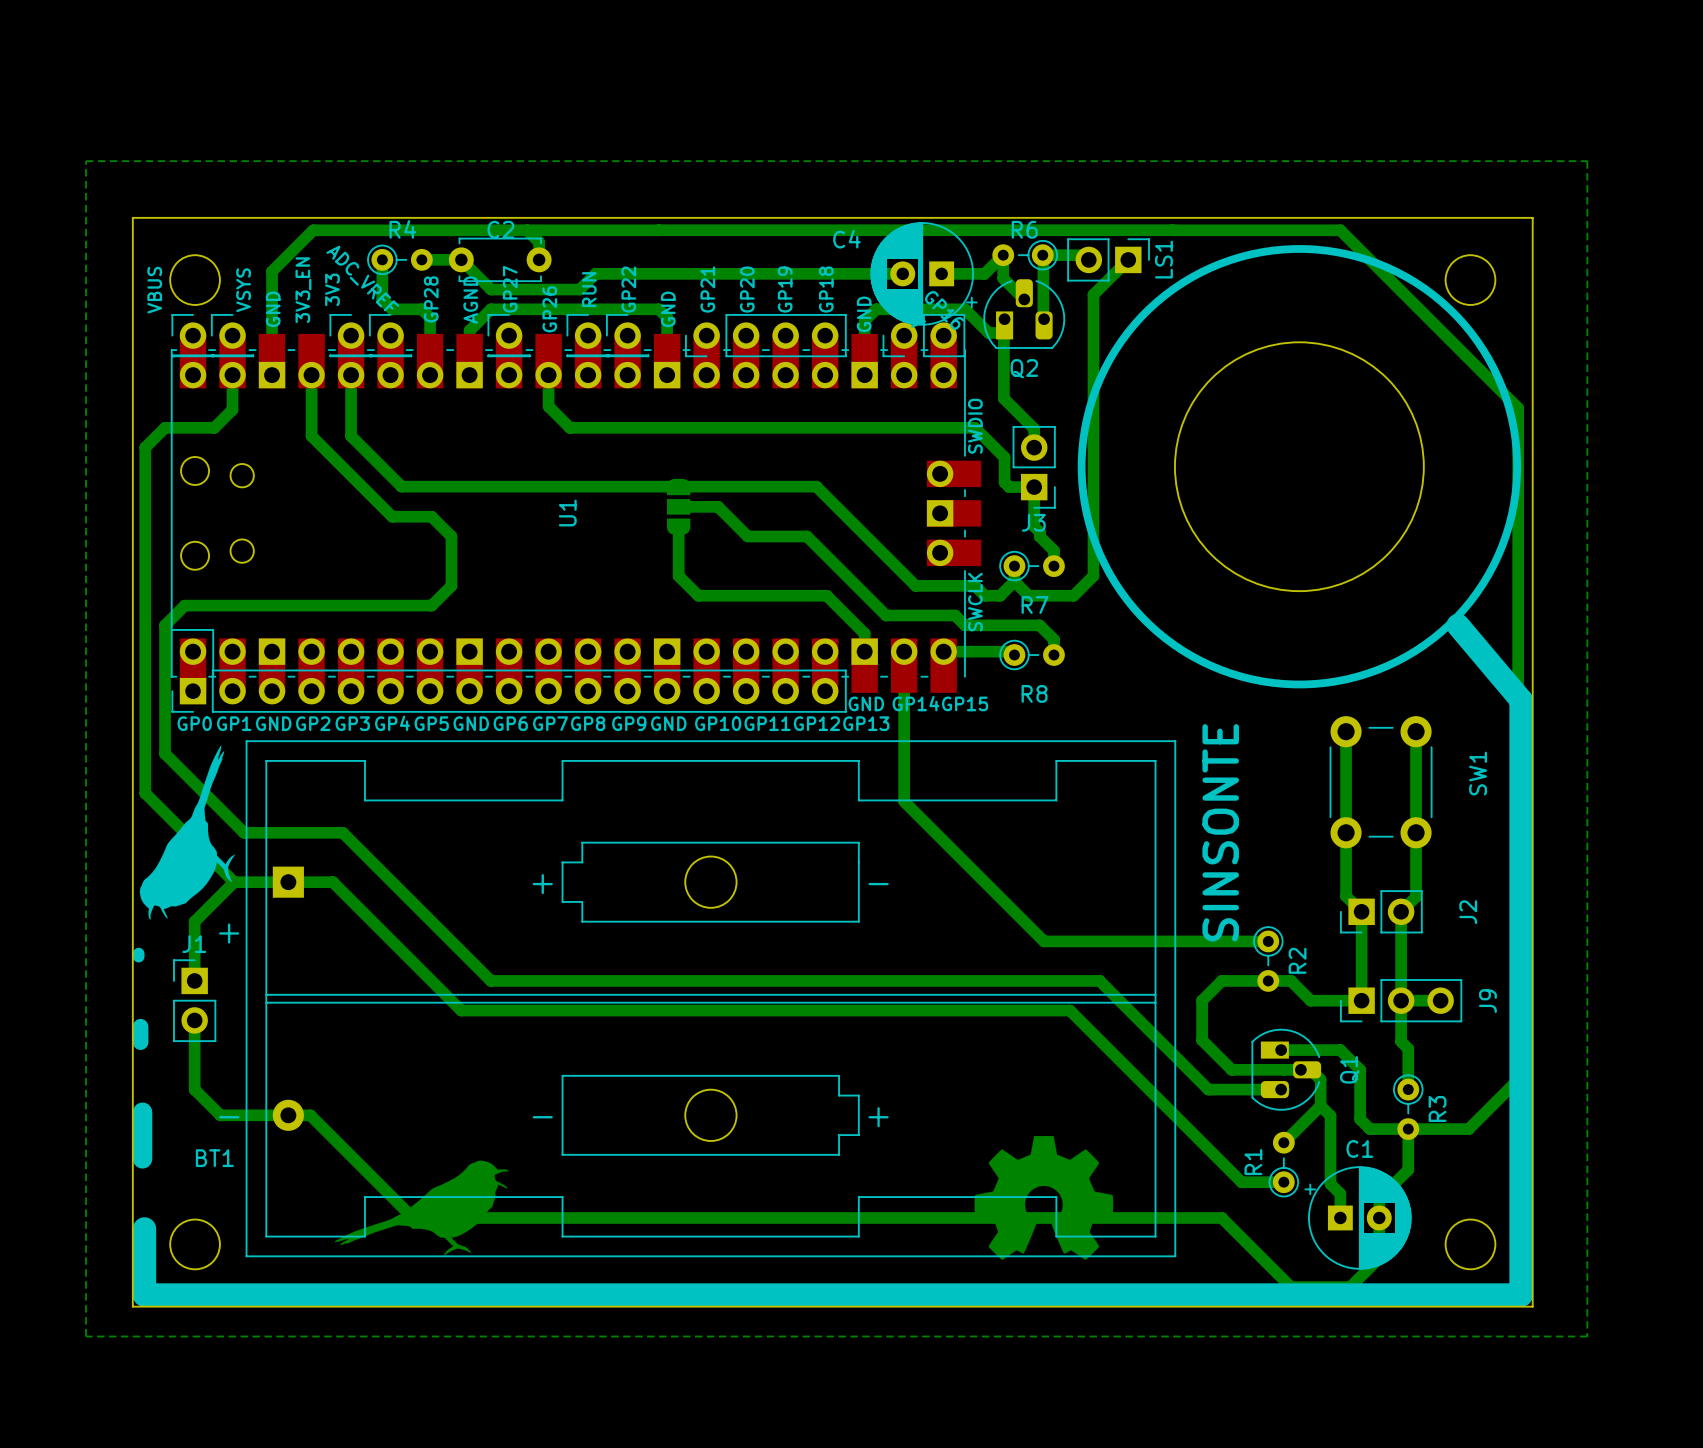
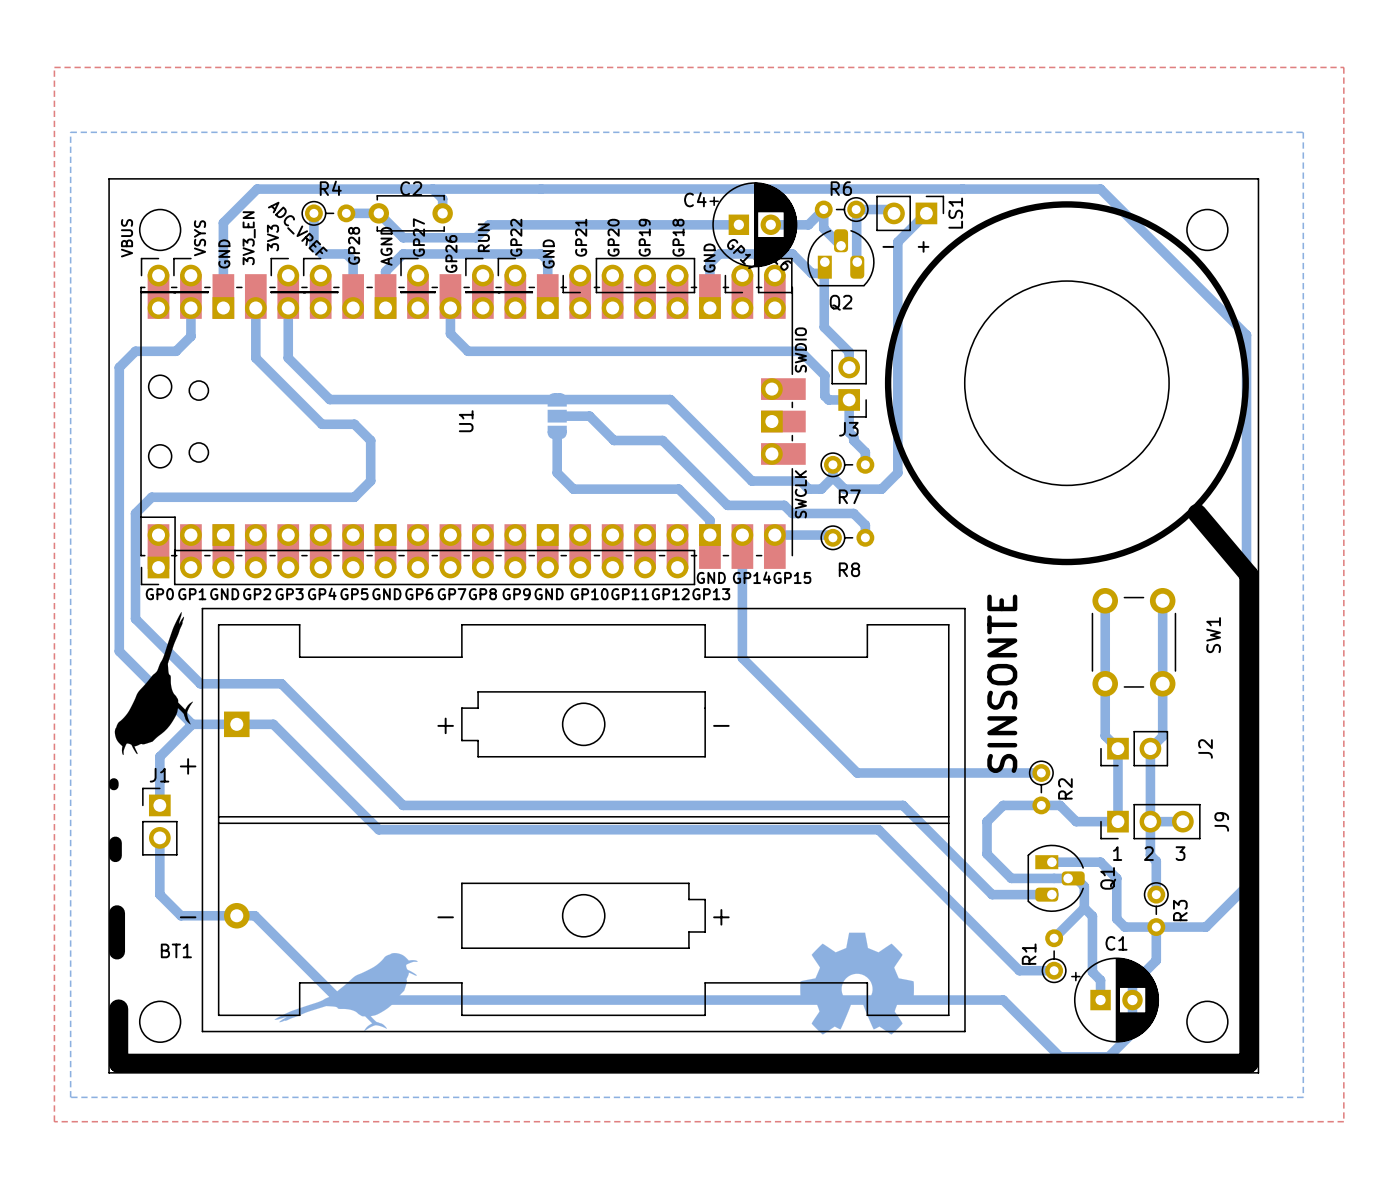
top zone outline: none -> (54, 67) (54, 1121) (1343, 1121) (1343, 67) (54, 67)
C4 rotation: 0° (924, 273) -> 180° (753, 224)
text: none -> - + (905, 246)
text: none -> 1 2 3 (1149, 853)

